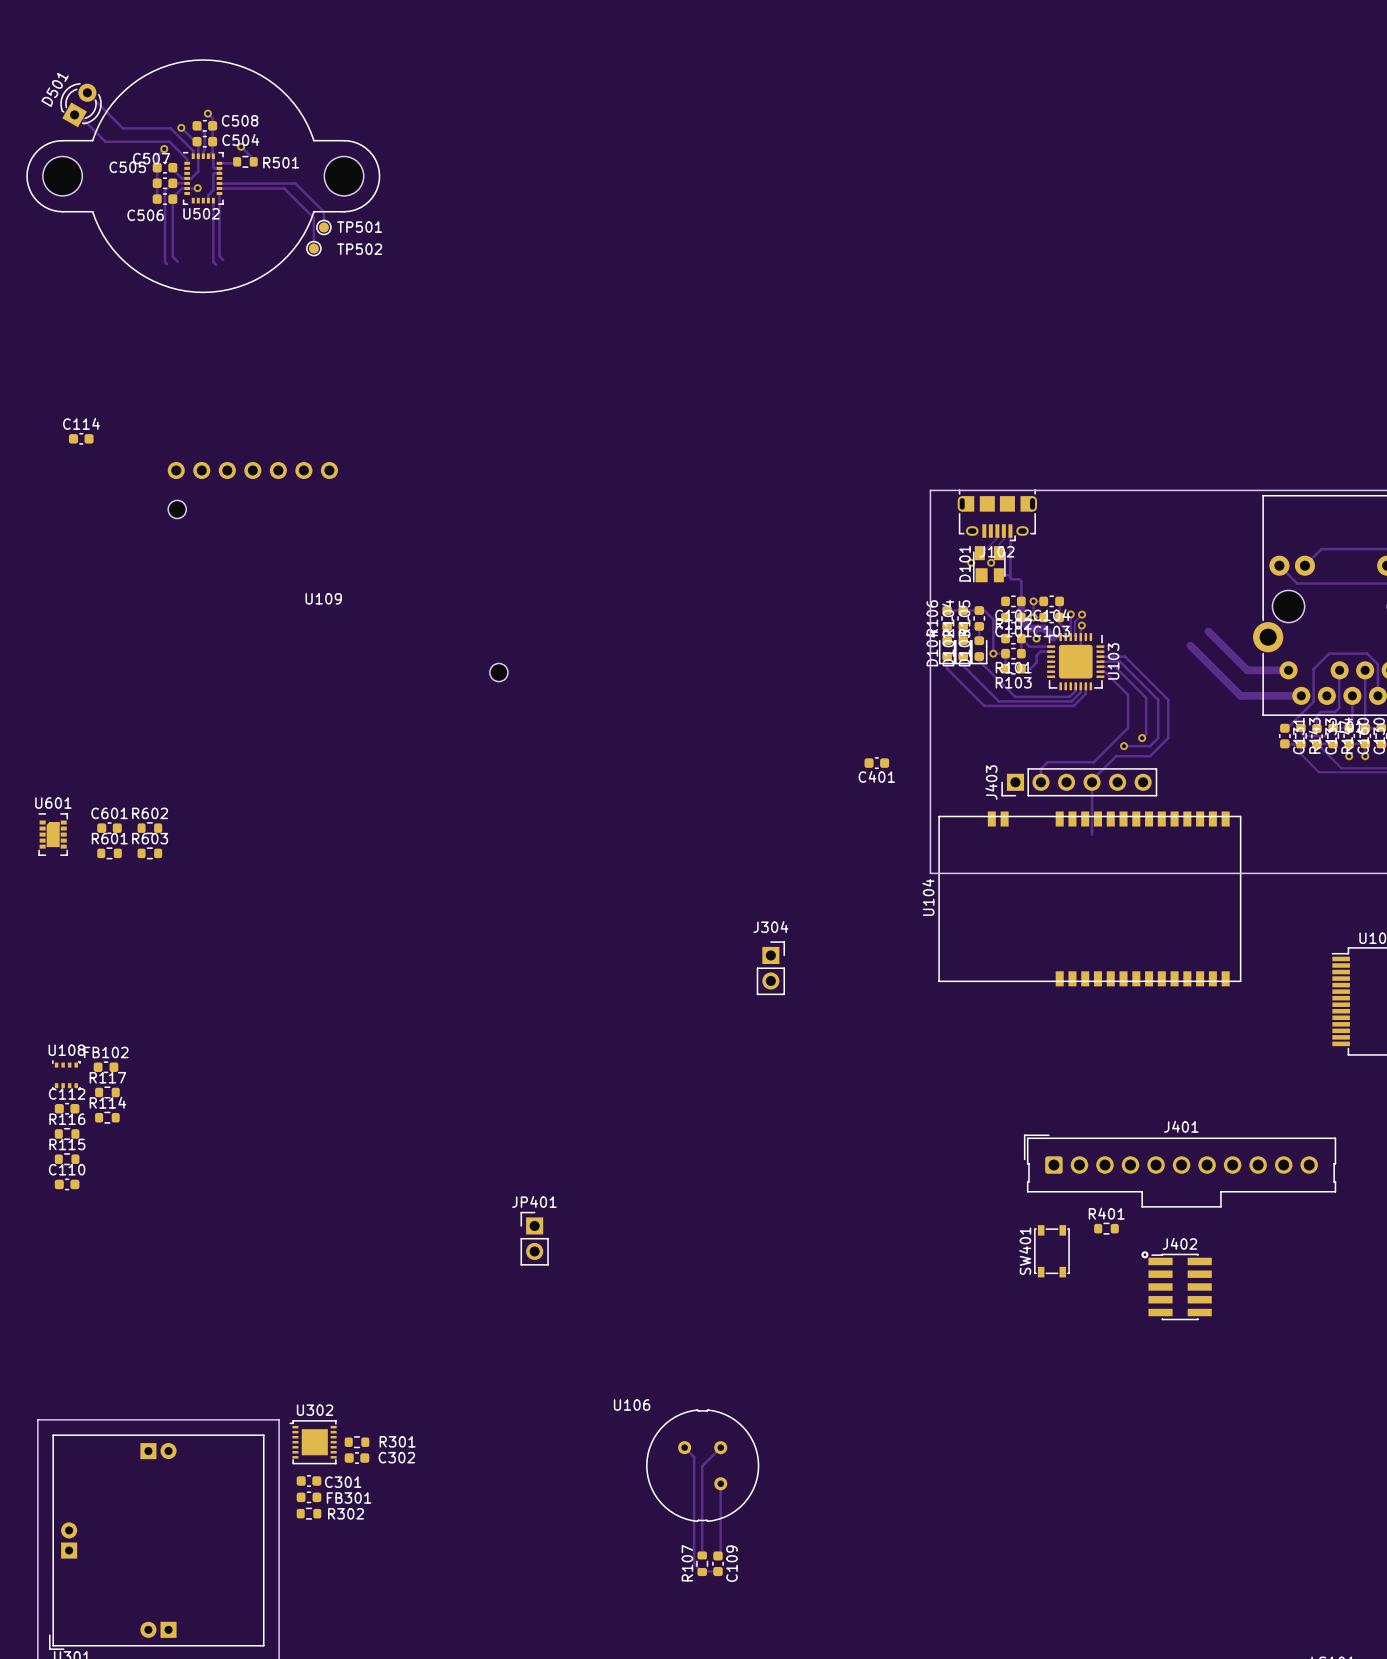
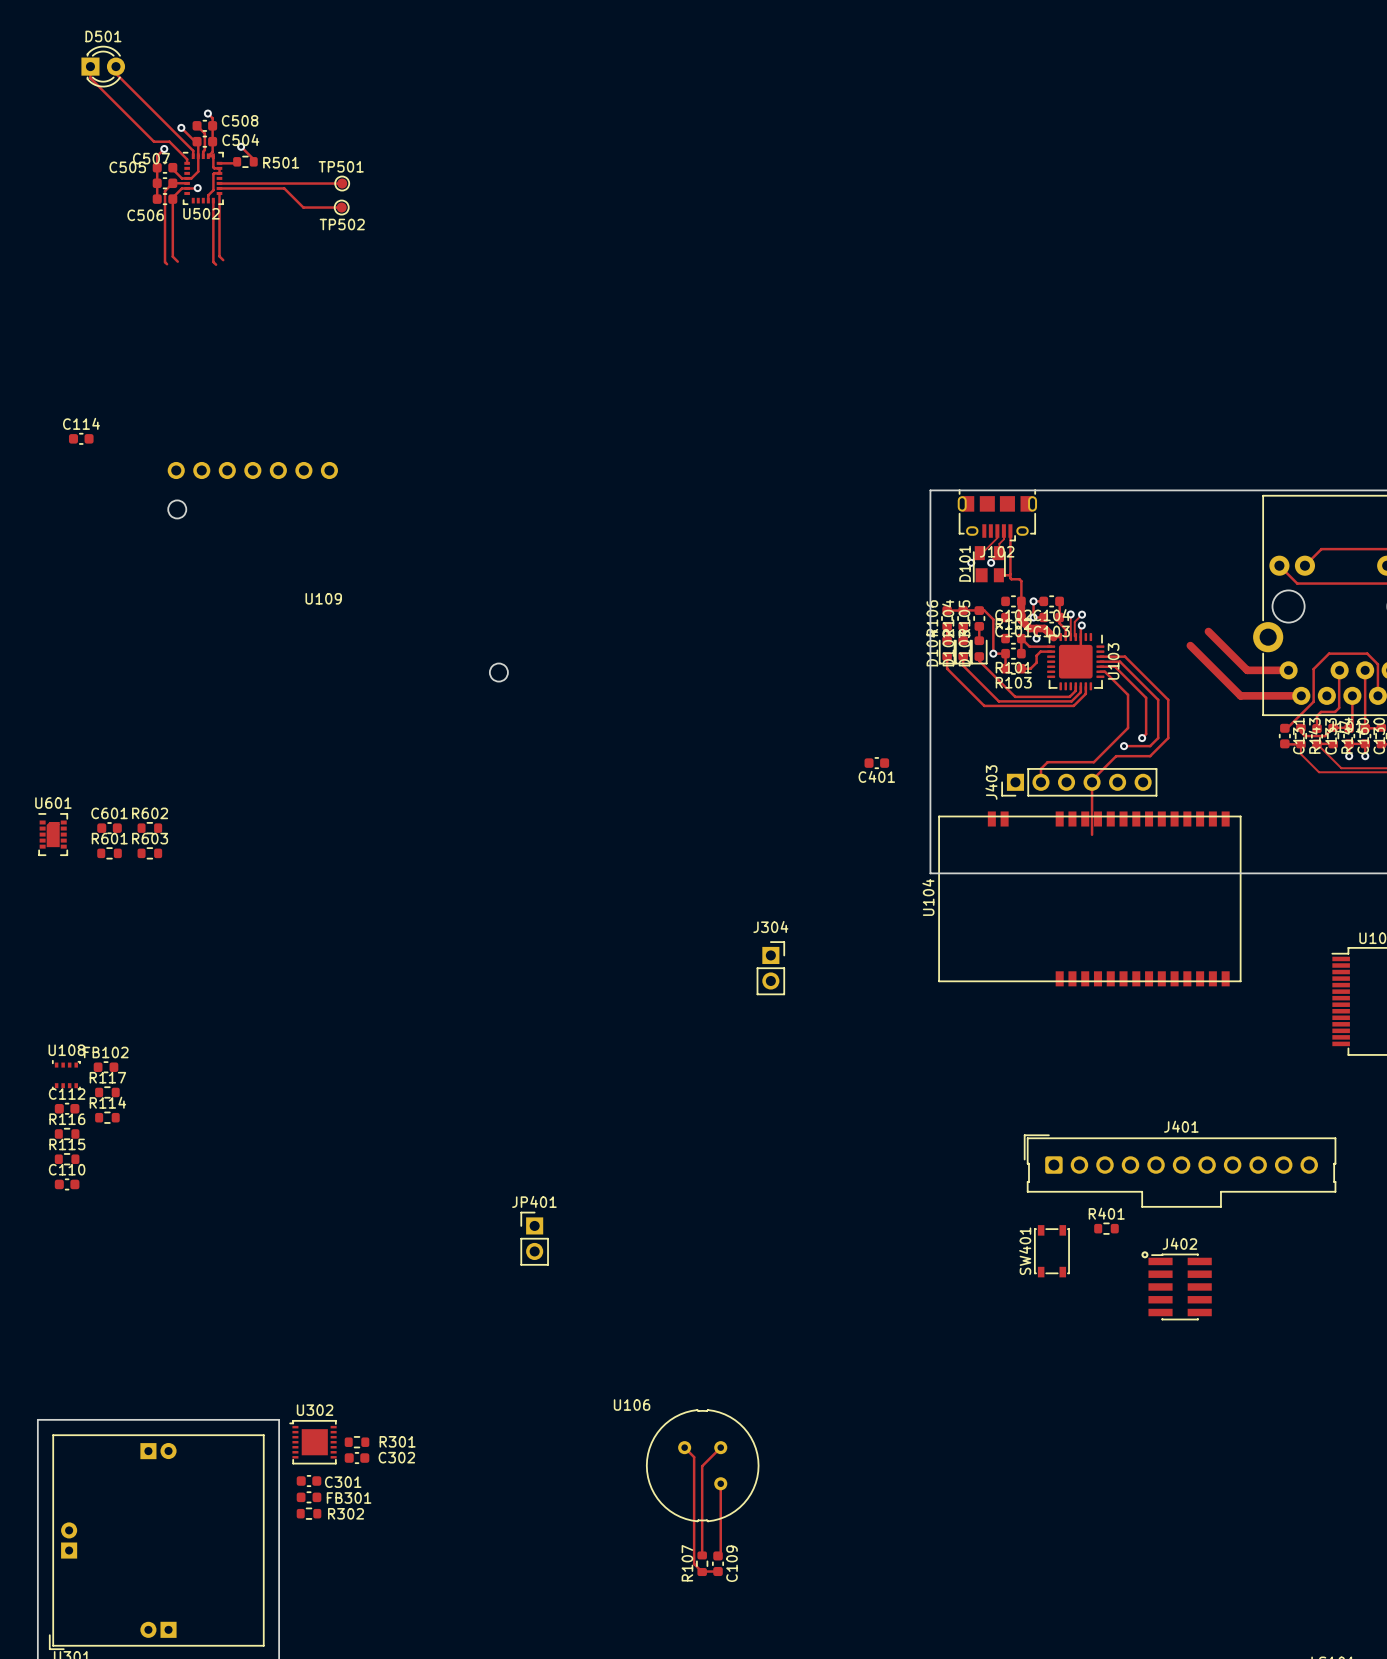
track: (87, 92) (122, 128) (170, 128) -> (115, 66) (115, 73) (170, 128)
D501 rotation: 0° (81, 105) -> 60° clockwise (103, 66)
D501 position: (81, 105) -> (103, 66)
track: (74, 114) (78, 114) (105, 141) (154, 141) -> (90, 66) (90, 78) (154, 141)
part: (203, 176) -> none
track: (295, 183) (323, 211) (323, 227) -> (295, 183) (342, 183)
track: (303, 207) (313, 218) (313, 248) -> (303, 207) (341, 207)
TP501 position: (323, 227) -> (342, 183)
TP501 name position: TP501 (359, 227) -> TP501 (341, 166)
TP502 position: (313, 248) -> (341, 207)
TP502 name position: TP502 (359, 249) -> TP502 (342, 224)

